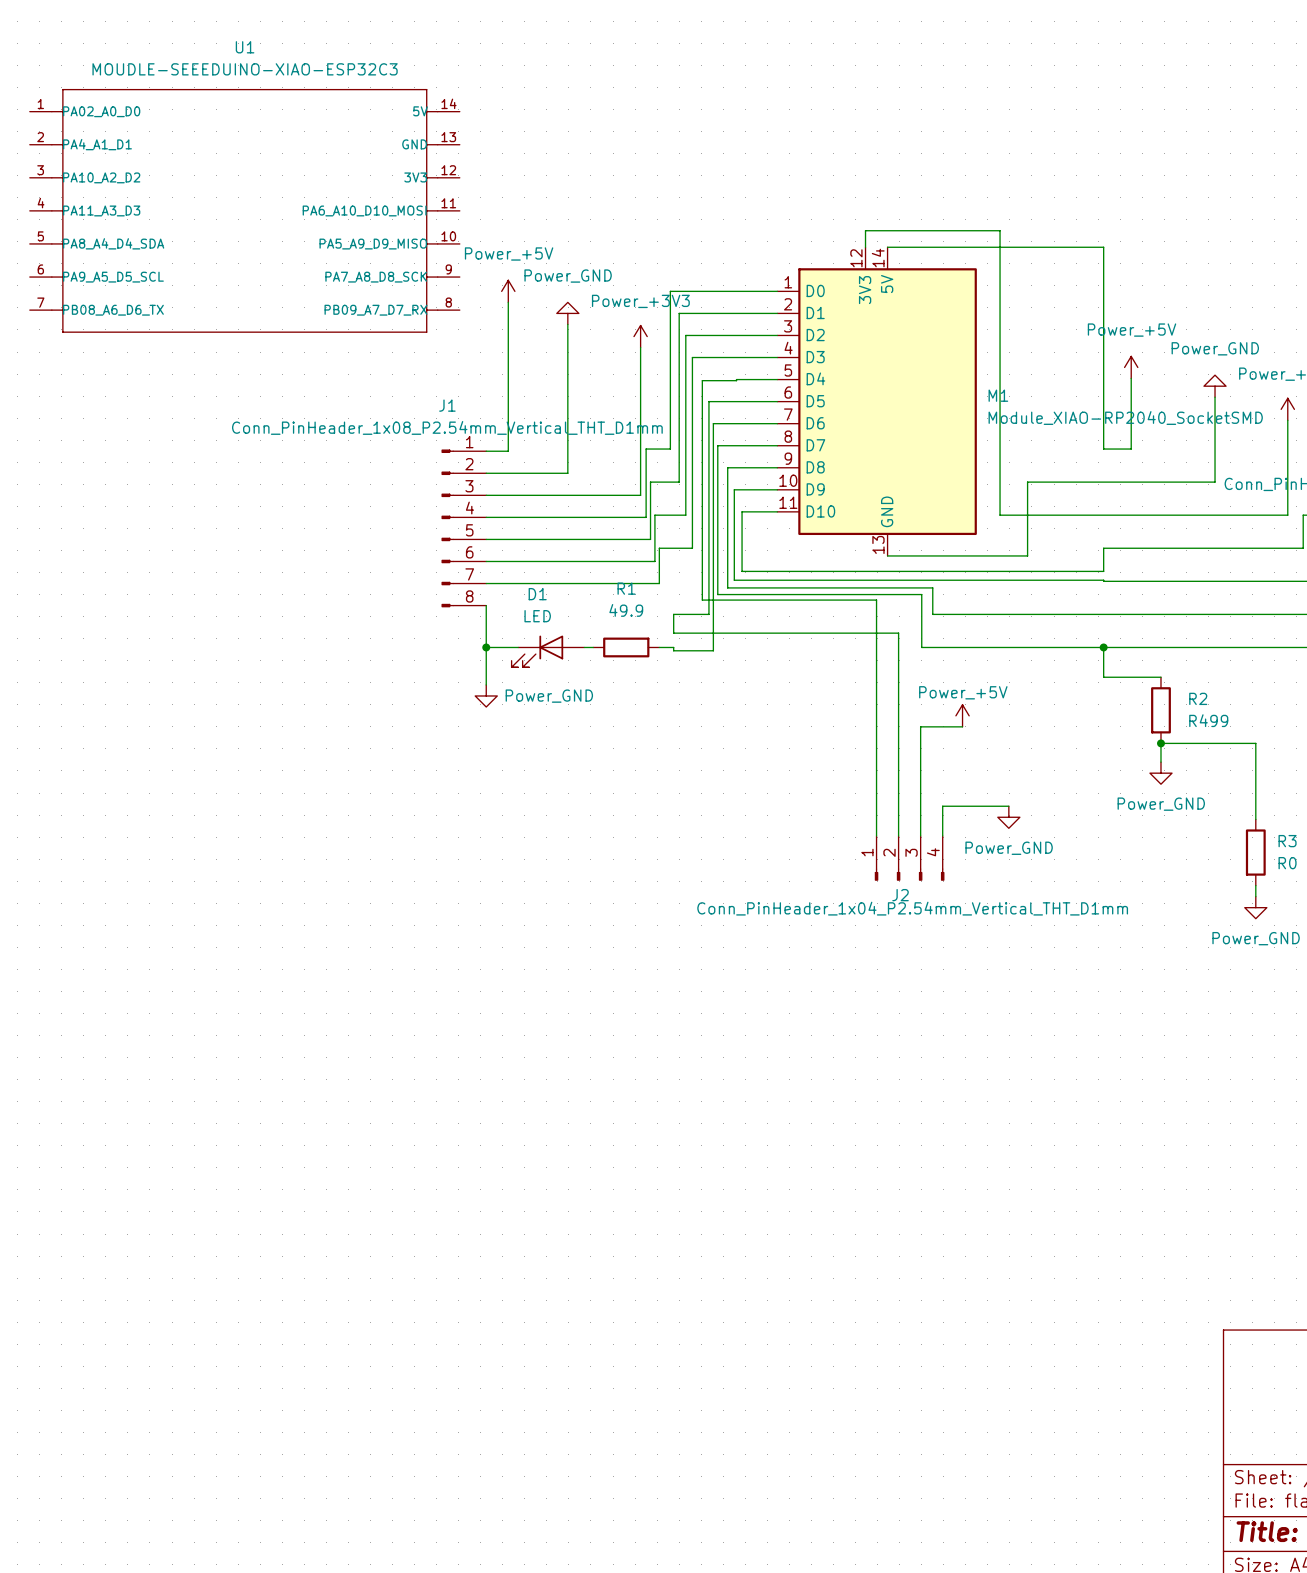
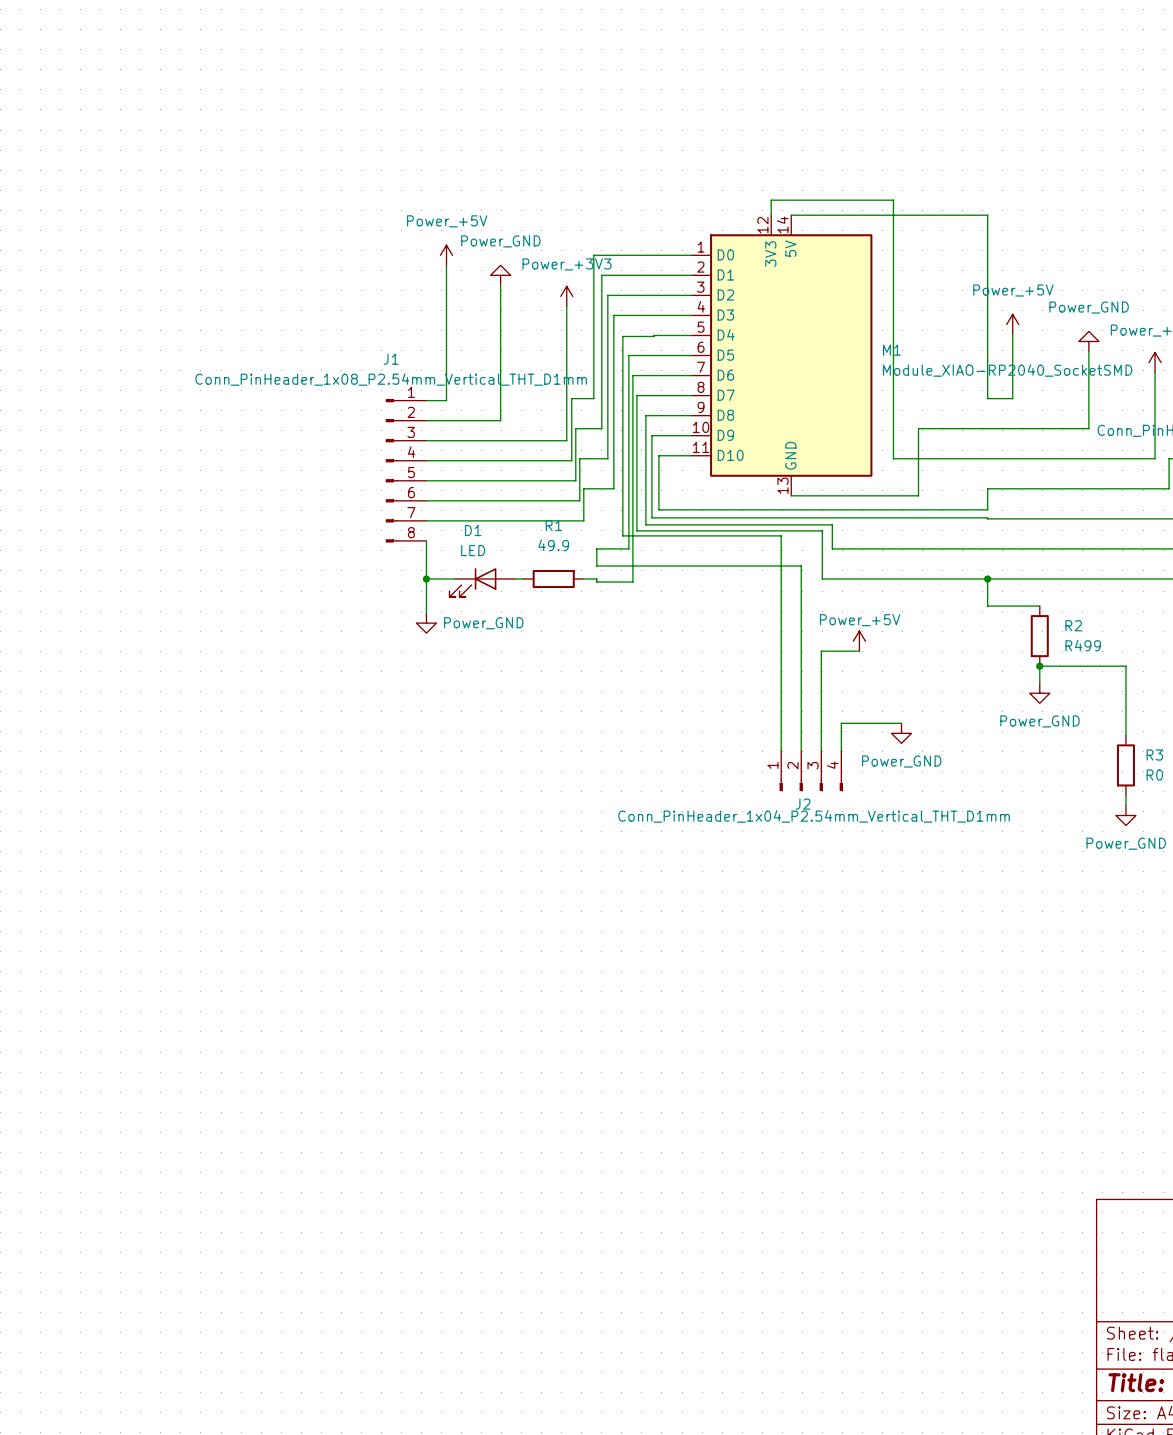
U1: MOUDLE-SEEEDUINO-XIAO-ESP32C3 (244, 210) -> none

